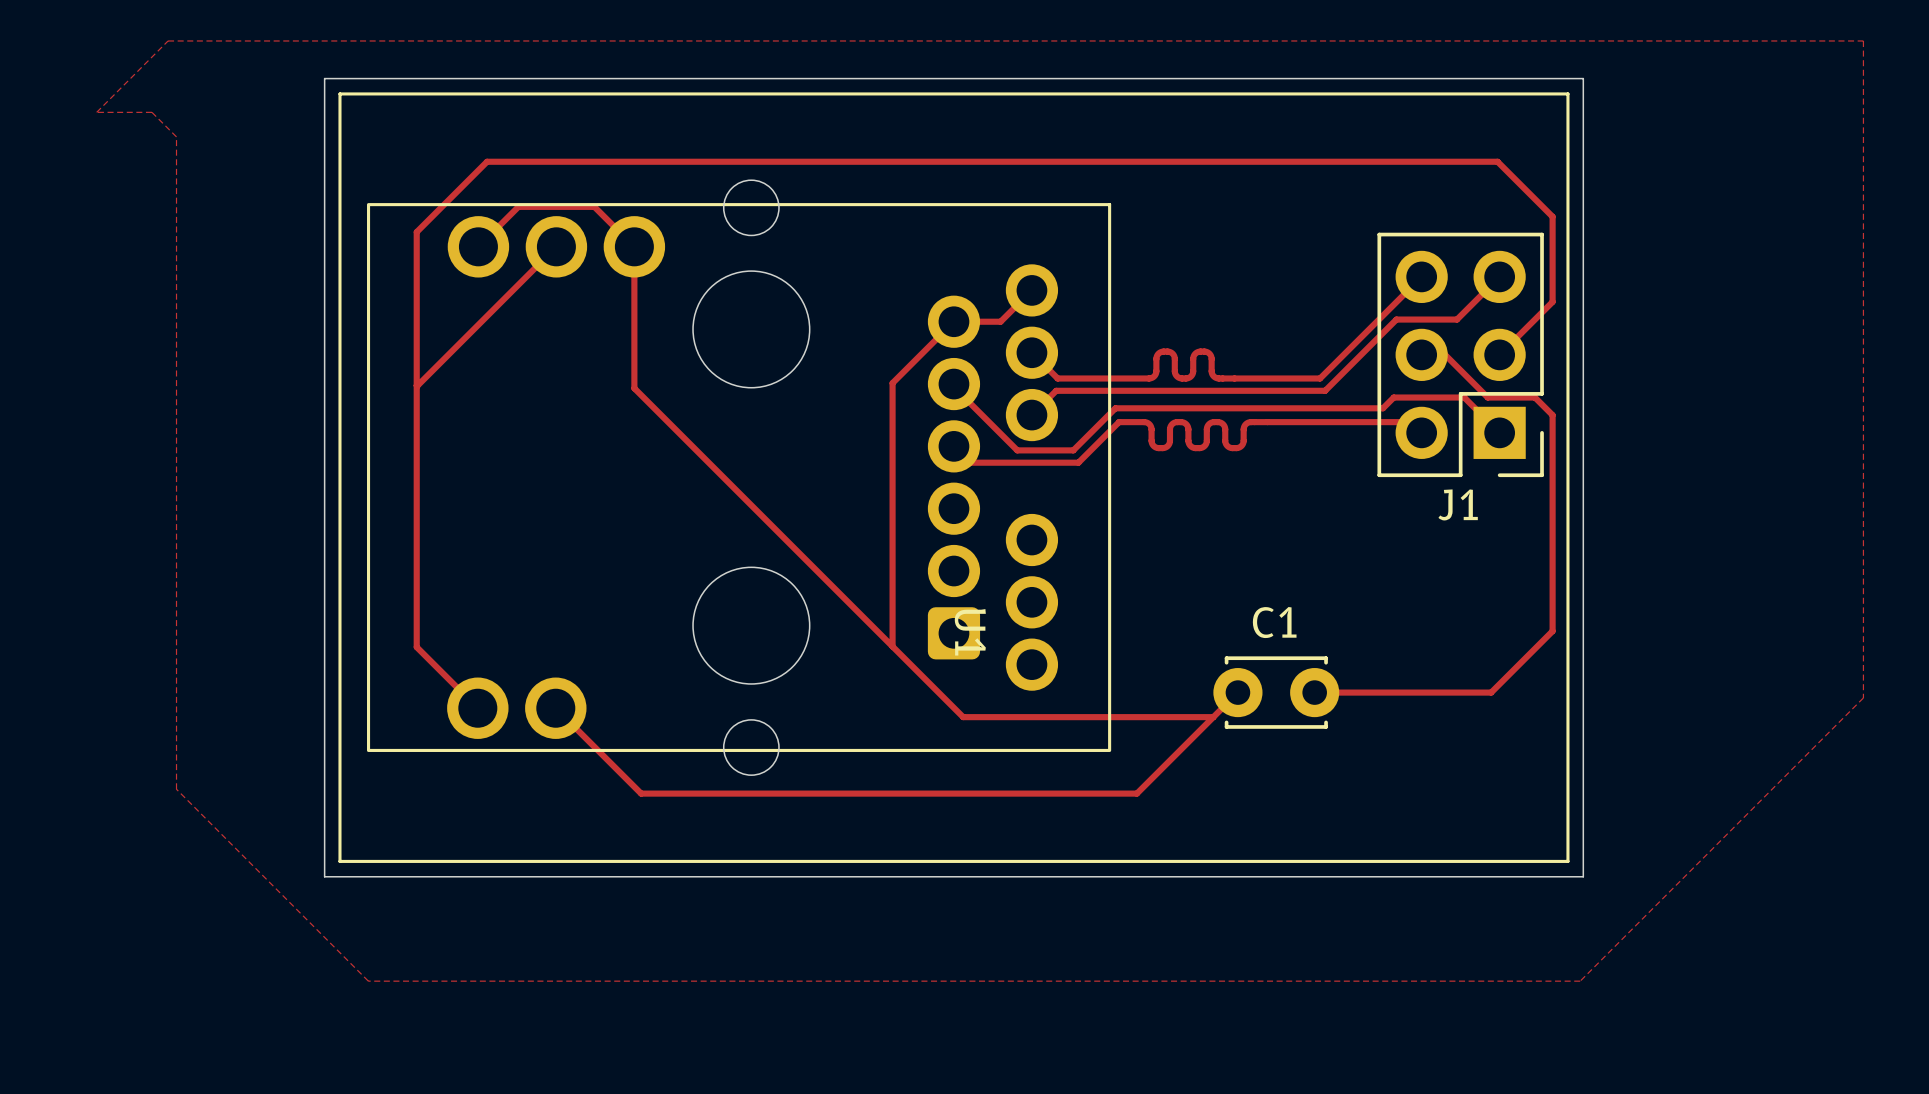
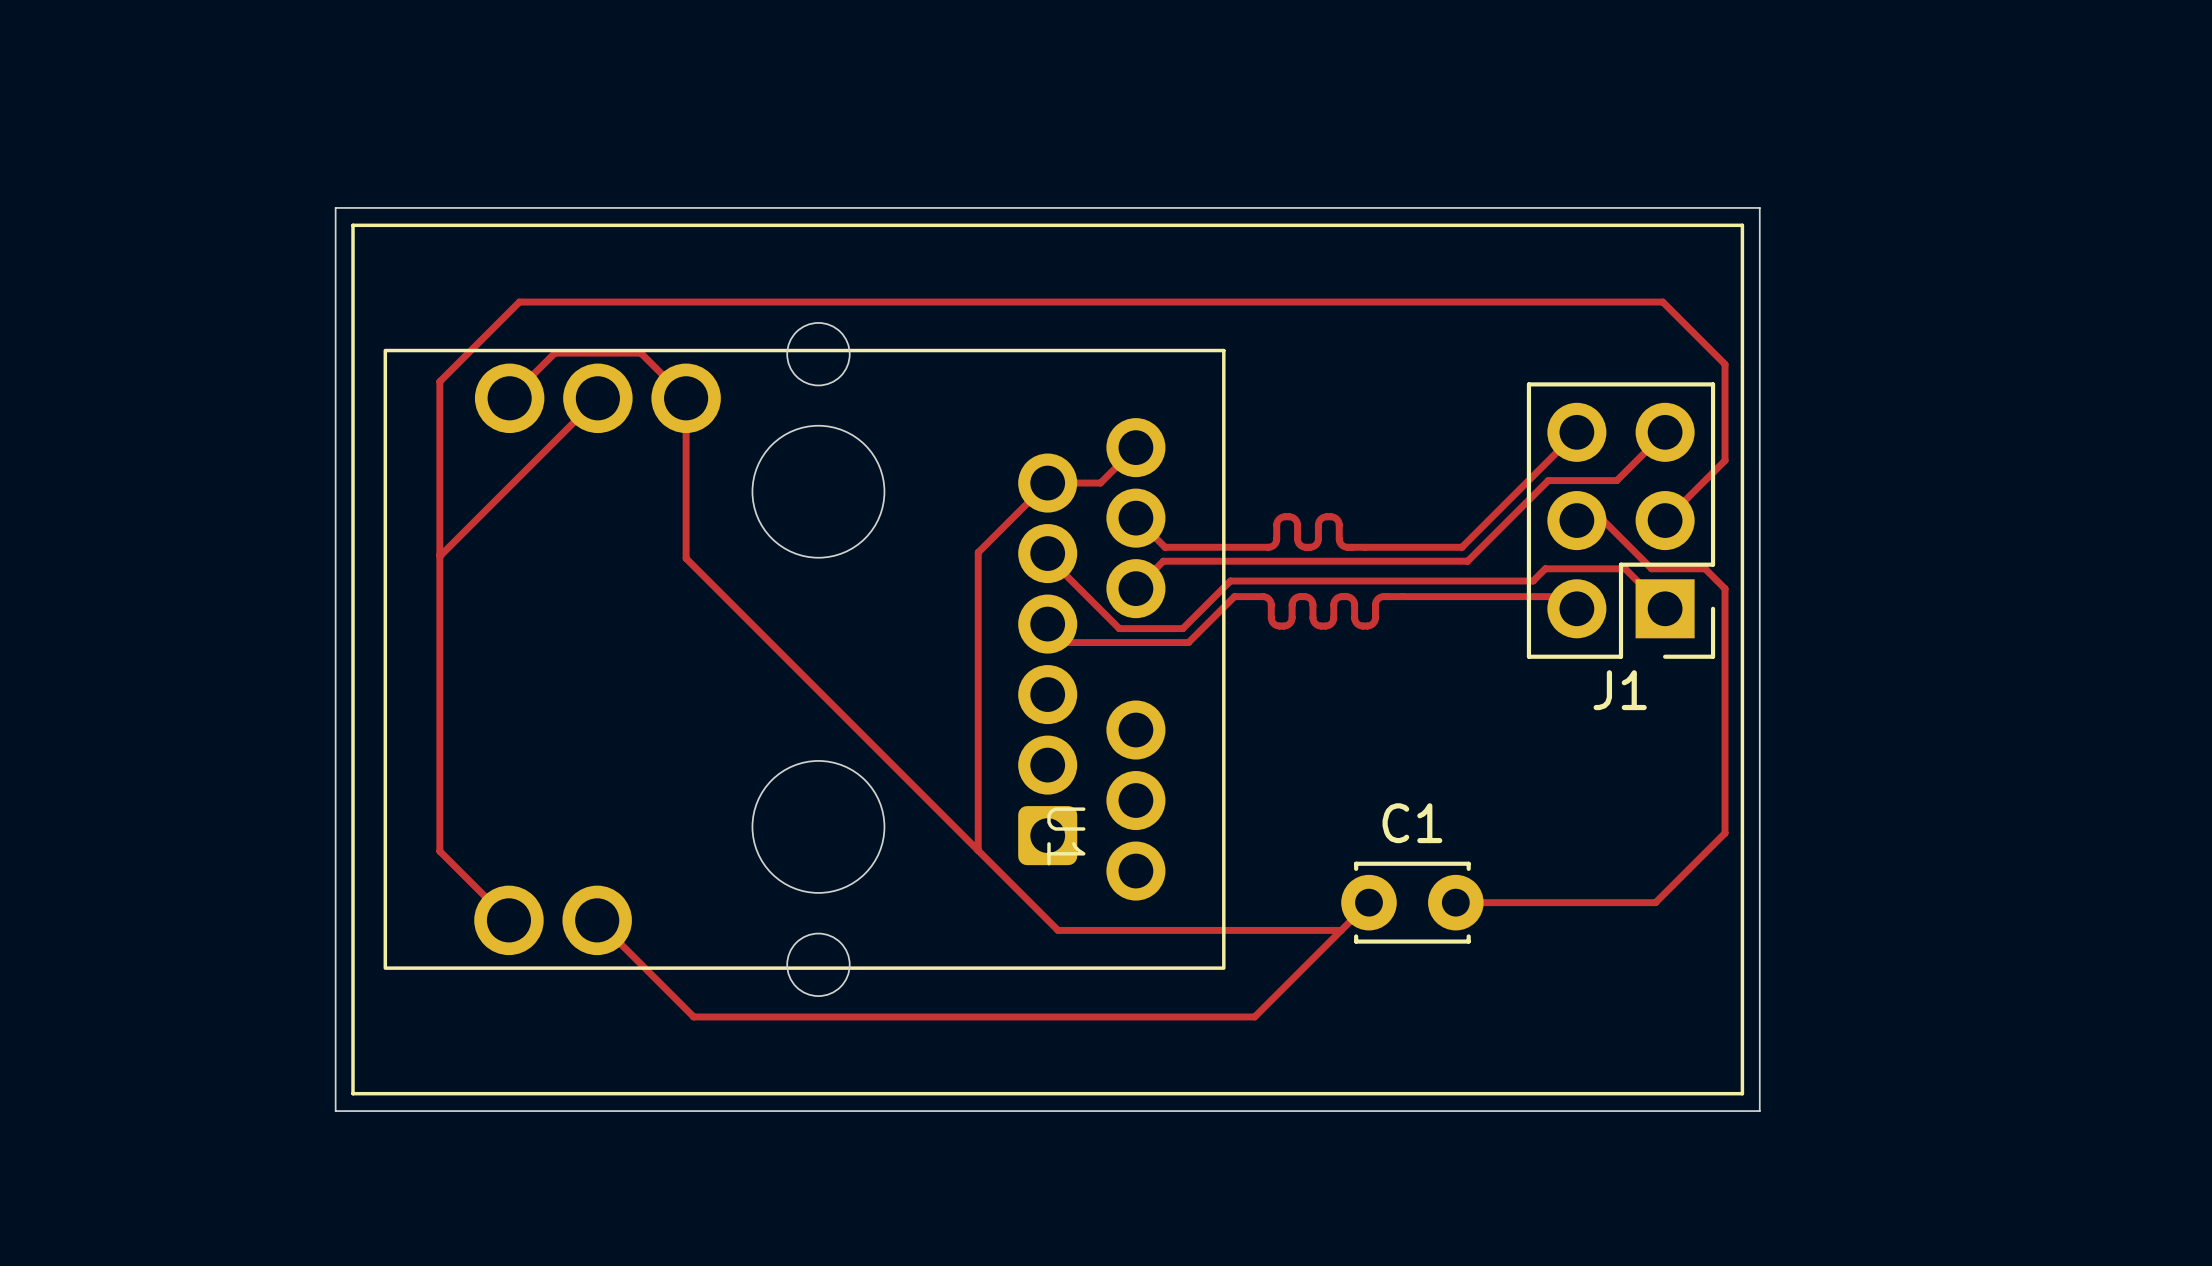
zone outline: (168, 40) (96, 112) (151, 112) (176, 136) (176, 789) (368, 981) (1580, 981) (1863, 697) (1863, 40) (168, 40) -> none

